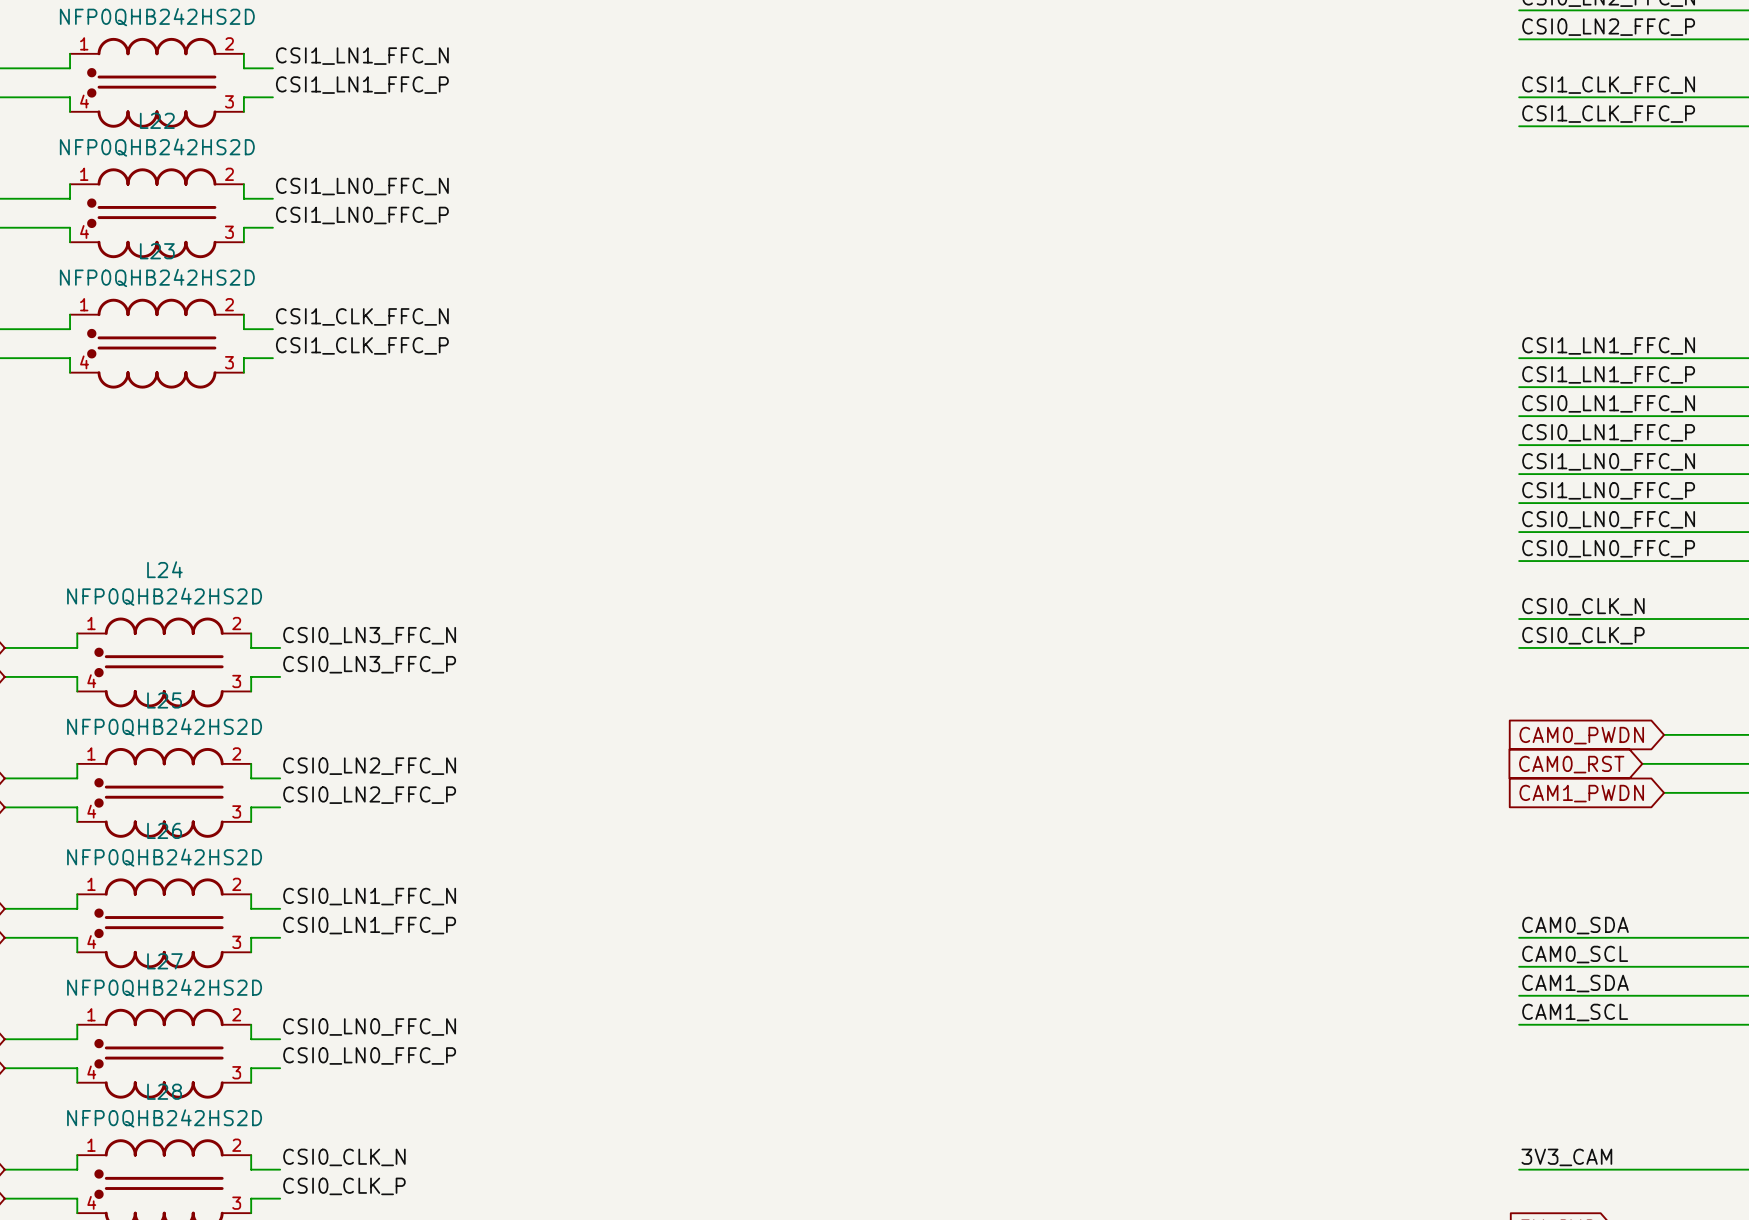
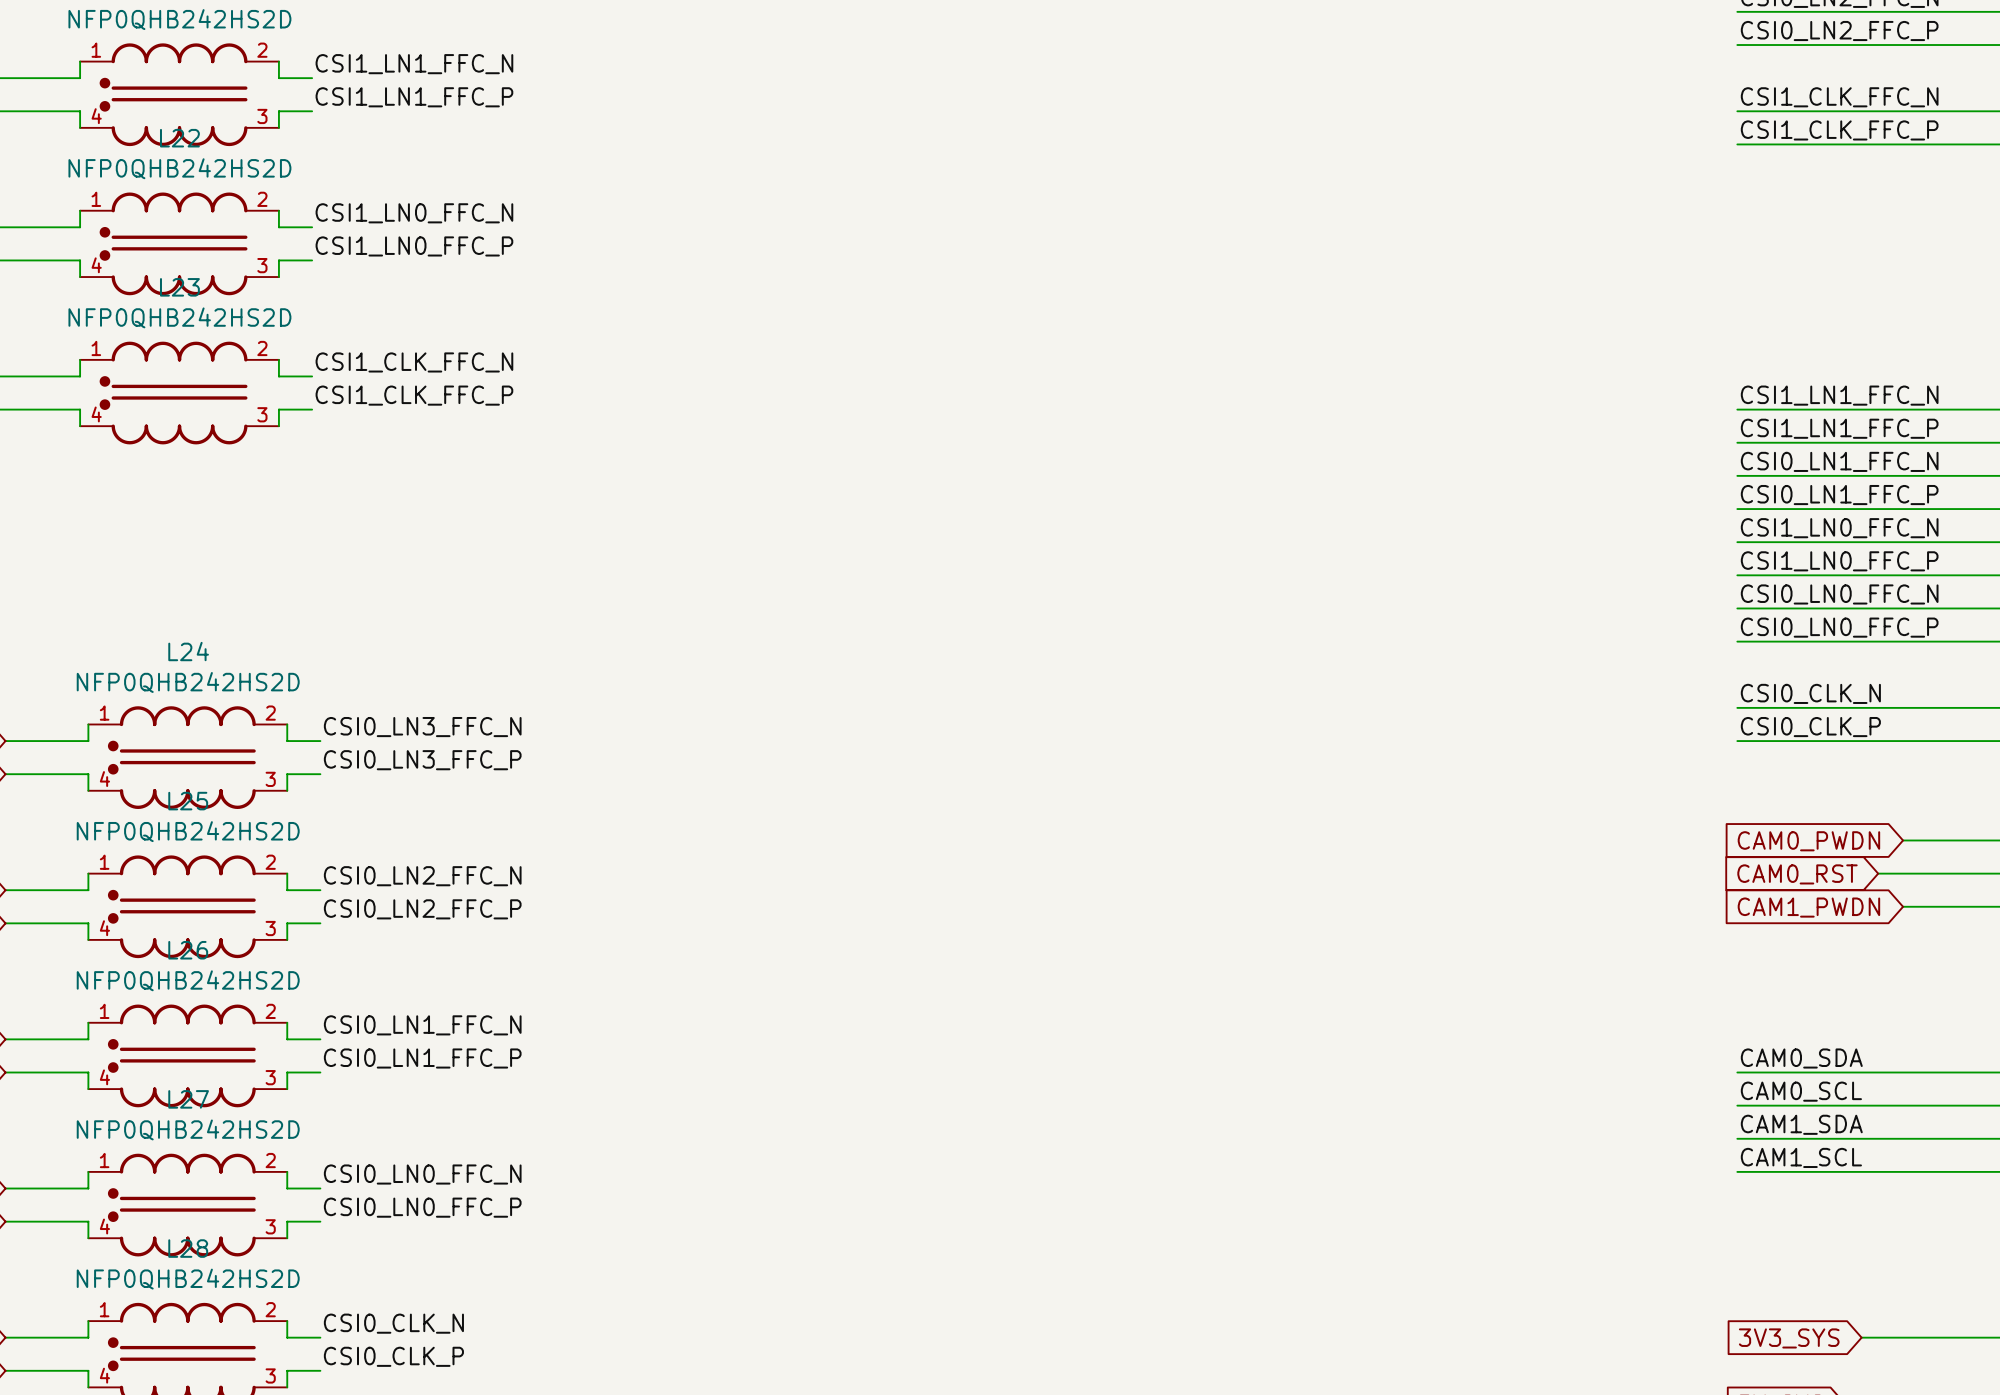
label: 3V3_CAM (1566, 1157) -> none
wire: (1519, 1169) (1627, 1169) -> none
global label: none -> 3V3_SYS (1789, 1338)

